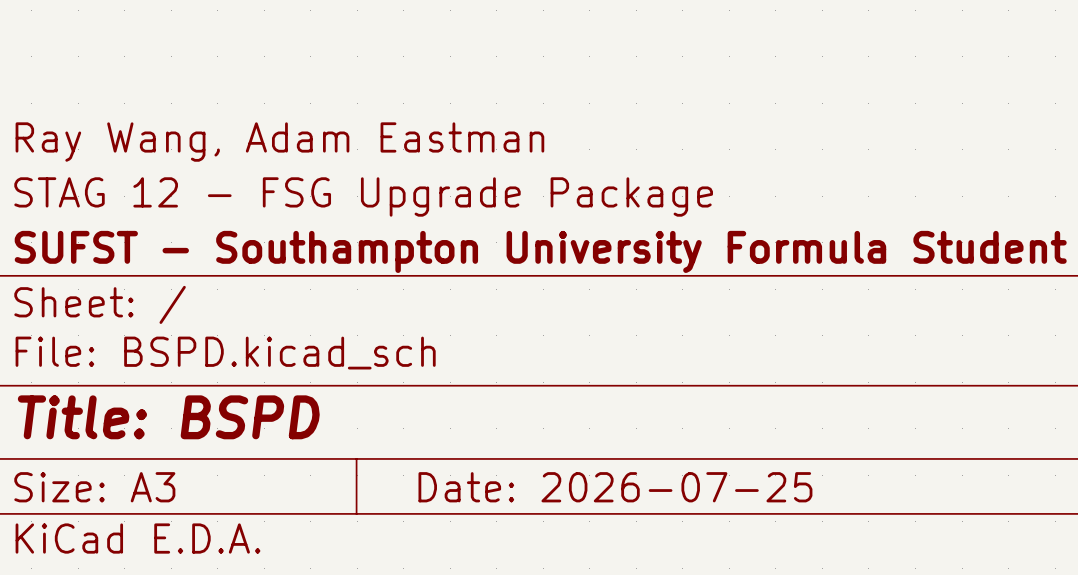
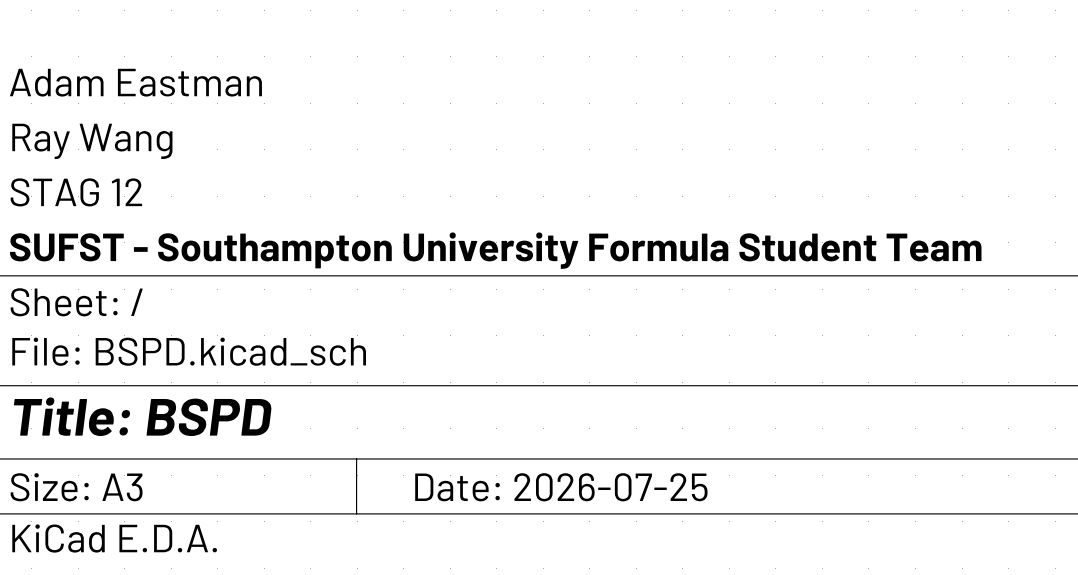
title block: none -> Adam Eastman (135, 82)
title block: Ray Wang, Adam Eastman (279, 142) -> Ray Wang (92, 141)
title block: STAG 12 - FSG Upgrade Package (363, 196) -> STAG 12 (76, 192)

